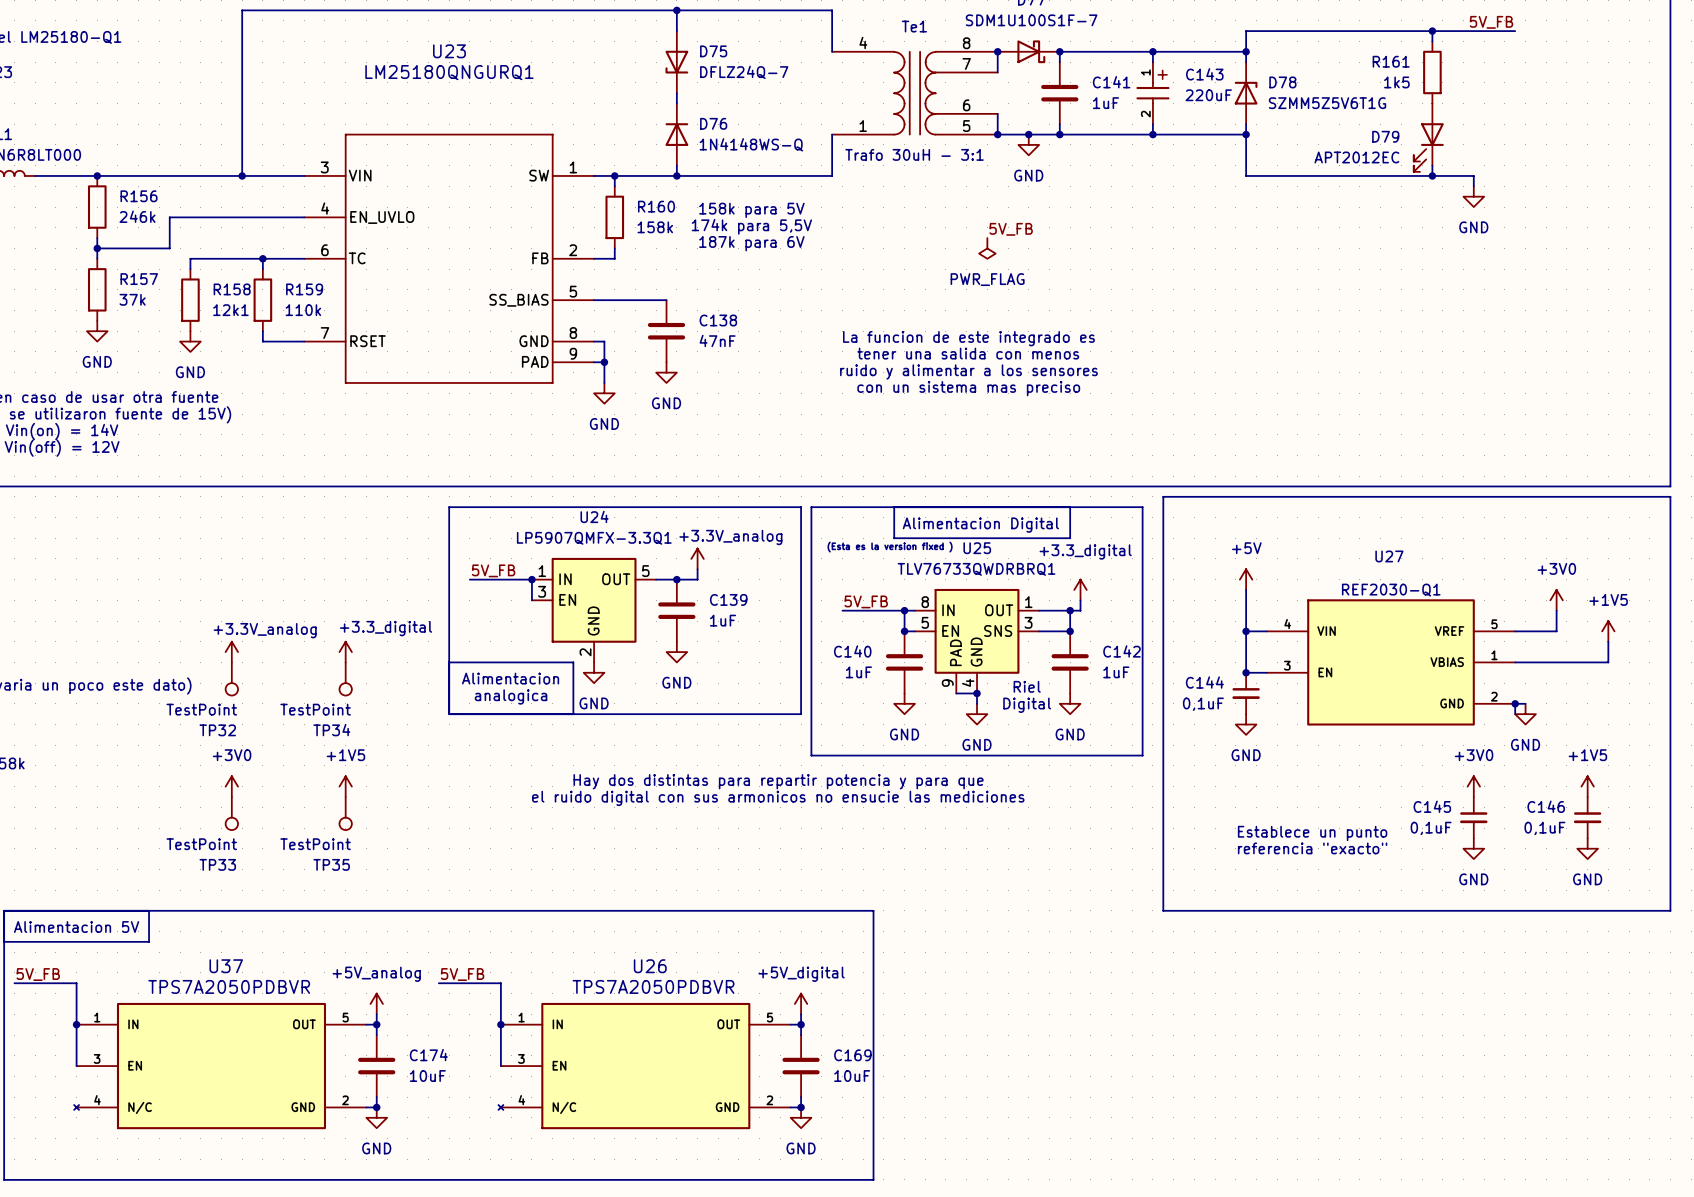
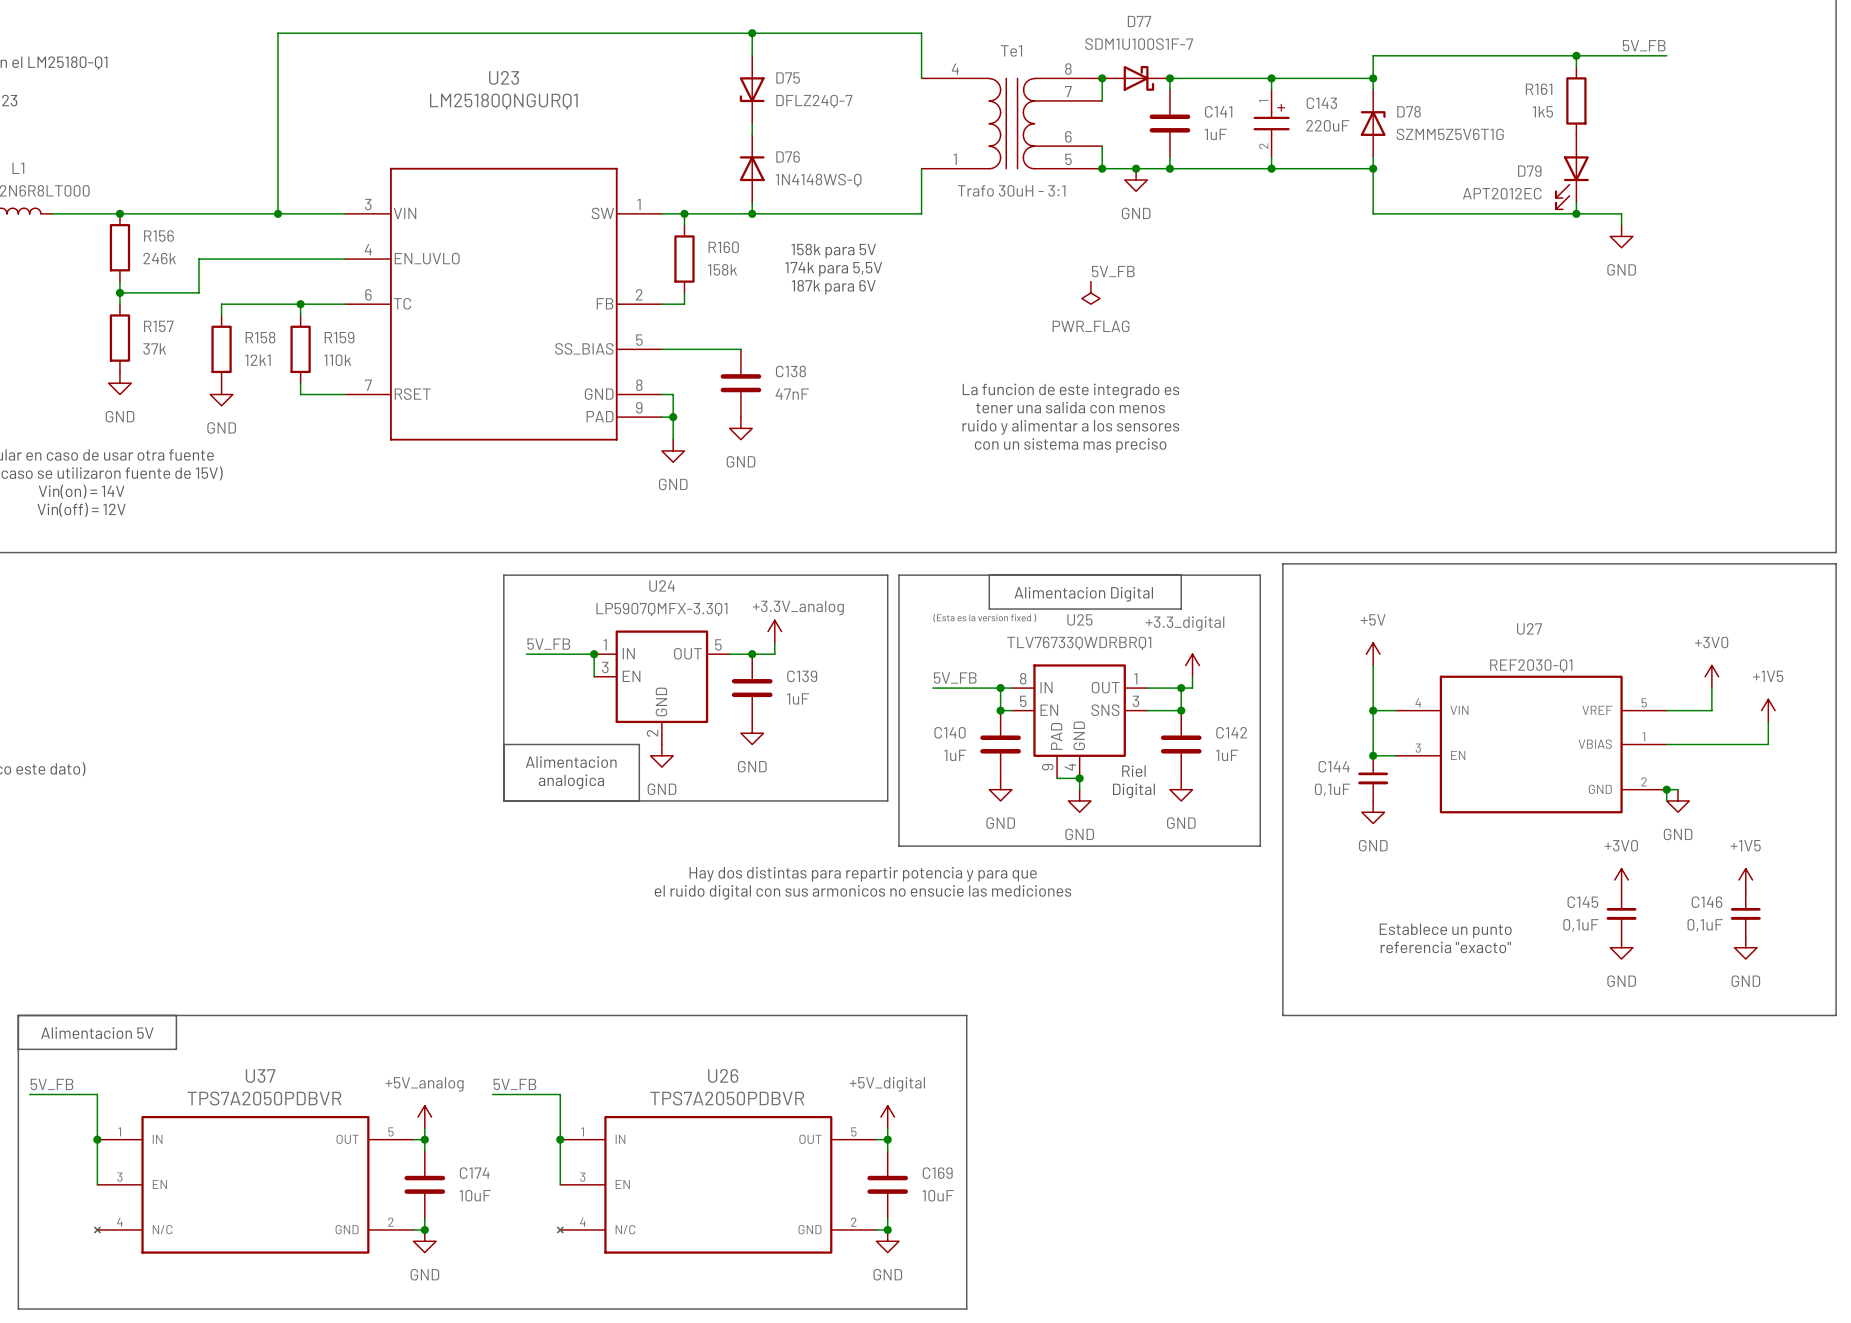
power symbol: +3.3V_analog (231, 652) -> none
power symbol: +3.3_digital (345, 652) -> none
TP32: TestPoint (231, 678) -> none
TP34: TestPoint (345, 678) -> none
power symbol: +3V0 (231, 786) -> none
power symbol: +1V5 (345, 786) -> none
TP33: TestPoint (231, 813) -> none
TP35: TestPoint (345, 813) -> none

